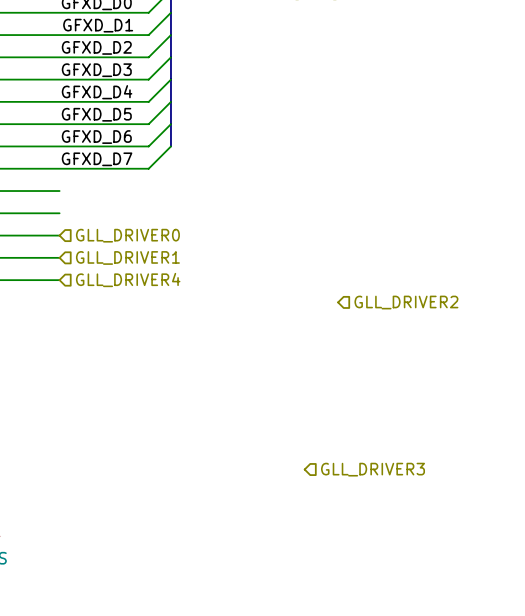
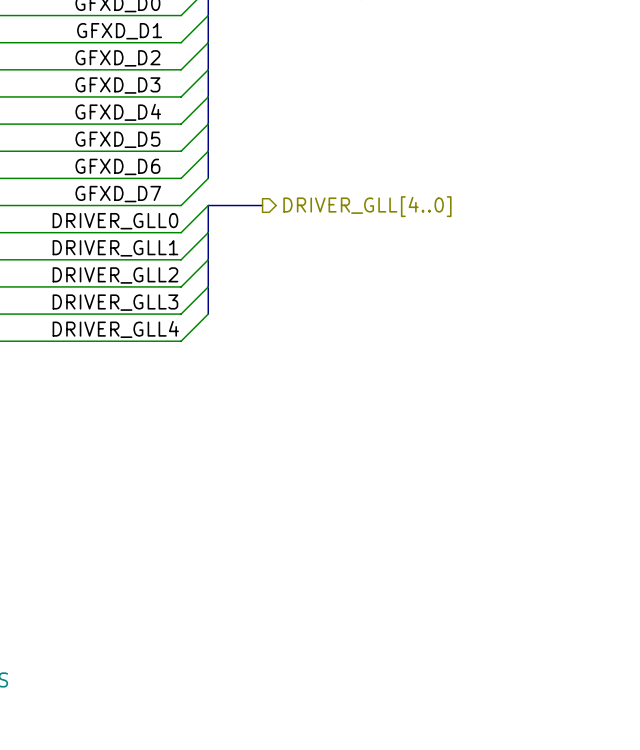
wire: none -> (208, 205) (181, 232) (72, 232)
bus: none -> (262, 205) (208, 205) (208, 314)
hierarchical label: none -> DRIVER_GLL[4..0] (367, 206)
label: none -> DRIVER_GLL0 (115, 221)
wire: none -> (208, 232) (181, 259) (72, 259)
label: none -> DRIVER_GLL1 (115, 248)
wire: none -> (208, 259) (181, 286) (72, 286)
label: none -> DRIVER_GLL2 (115, 275)
hierarchical label: GLL_DRIVER0 (127, 235) -> none
wire: none -> (208, 286) (181, 314) (72, 314)
label: none -> DRIVER_GLL3 (115, 302)
hierarchical label: GLL_DRIVER1 (127, 257) -> none
wire: none -> (208, 314) (181, 341) (72, 341)
label: none -> DRIVER_GLL4 (115, 329)
hierarchical label: GLL_DRIVER4 (128, 279) -> none
hierarchical label: GLL_DRIVER2 (406, 302) -> none
hierarchical label: GLL_DRIVER3 (373, 469) -> none

